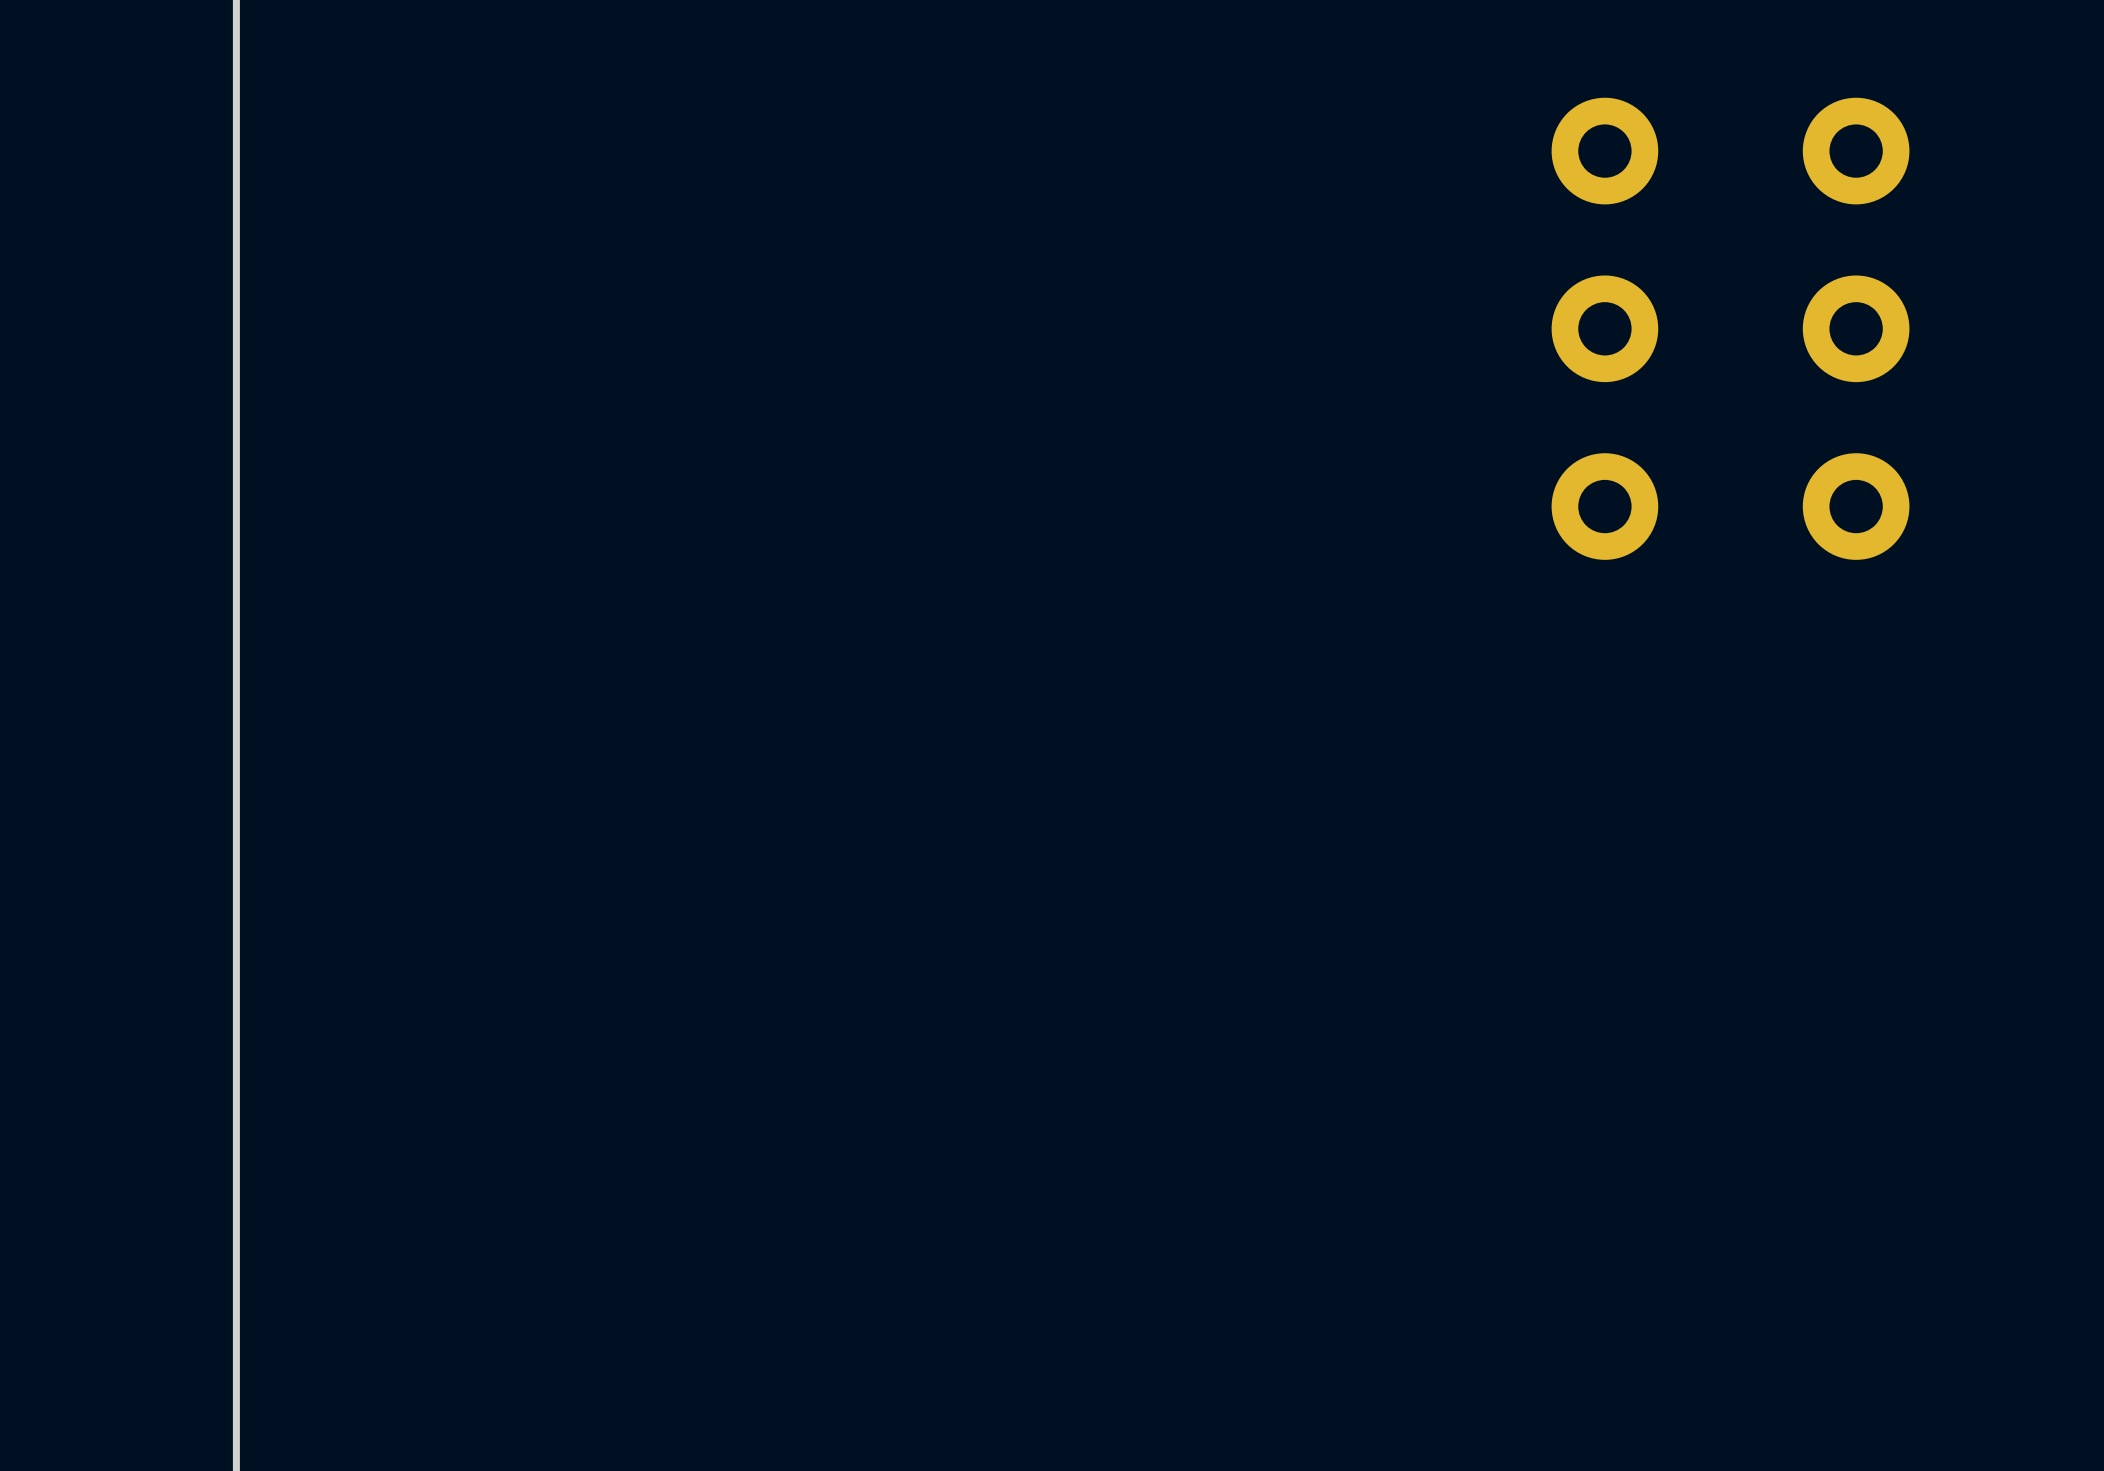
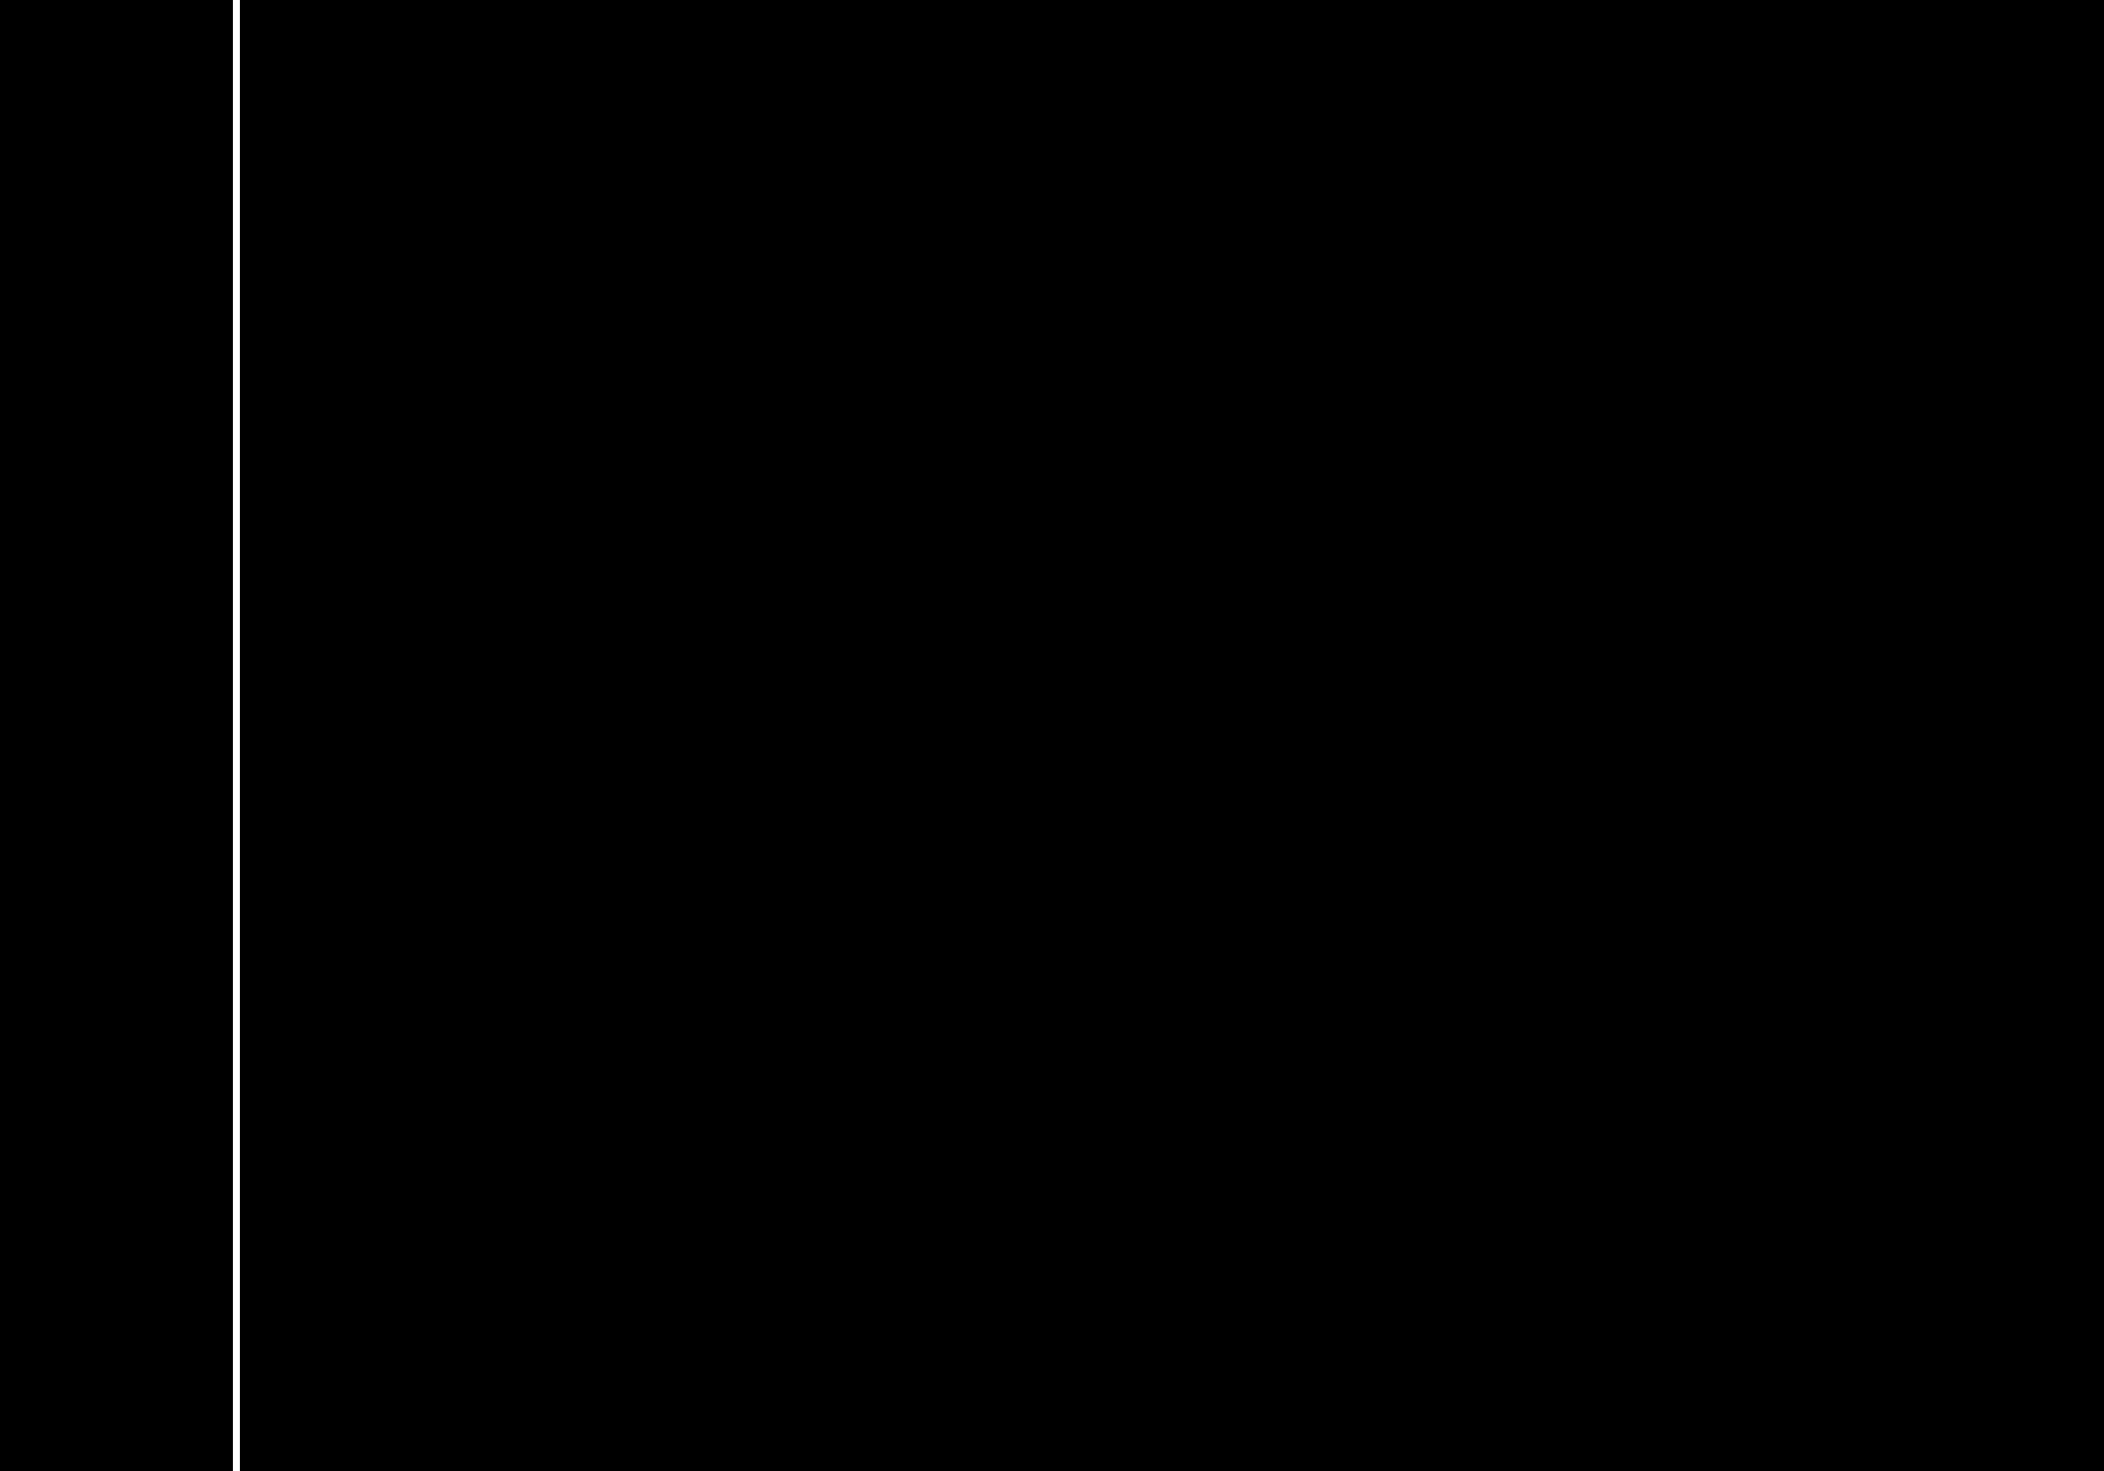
part: (1604, 328) -> none
part: (1856, 328) -> none

